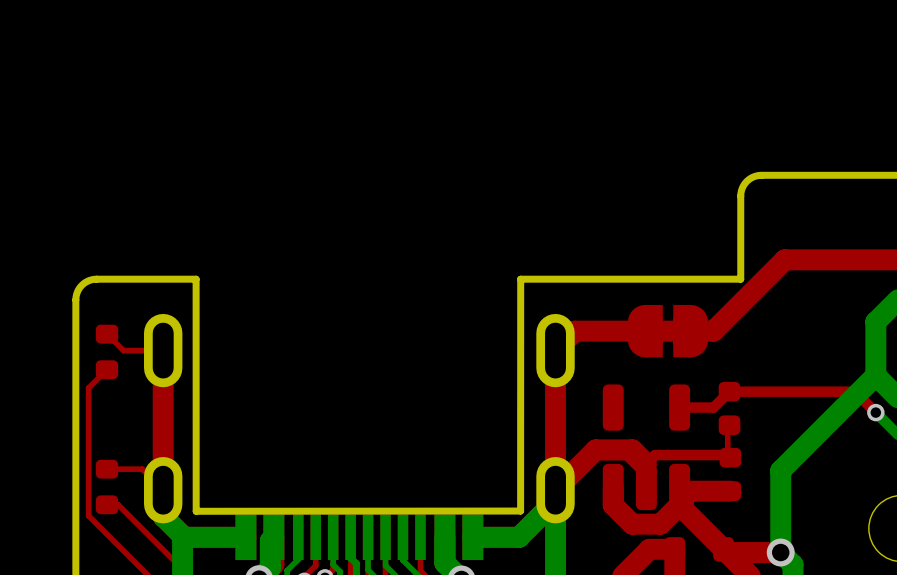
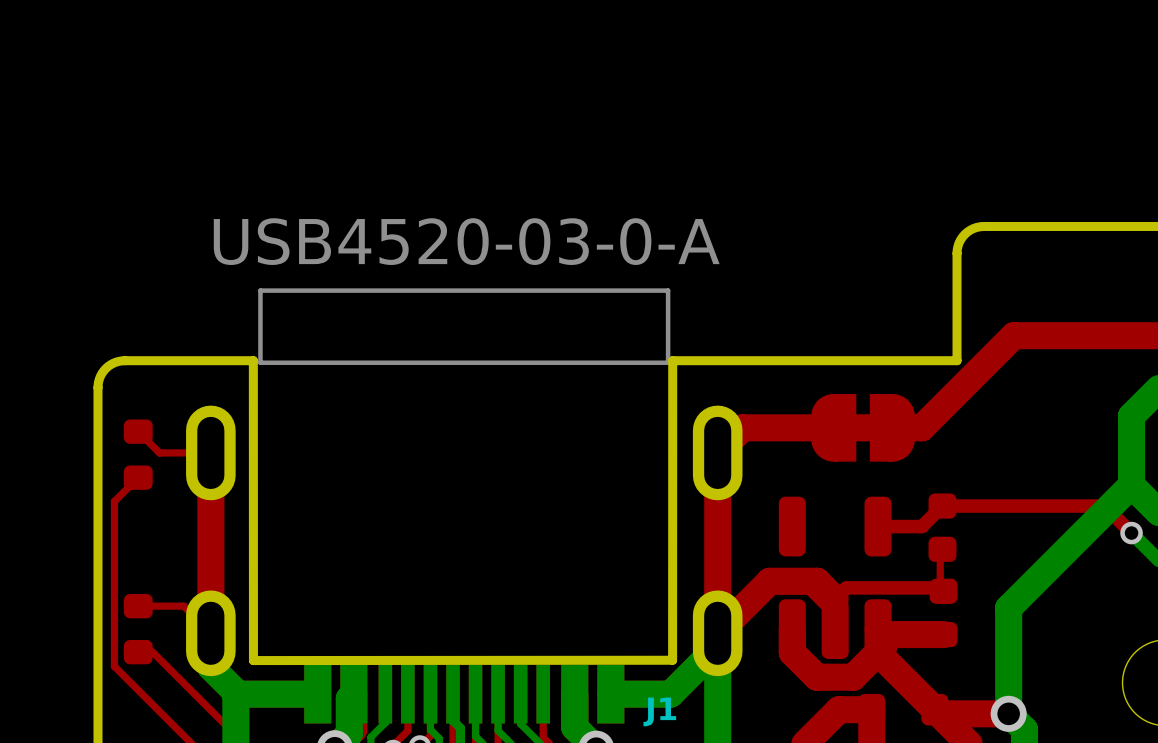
J1 side: top (359, 436) -> bottom (464, 505)

